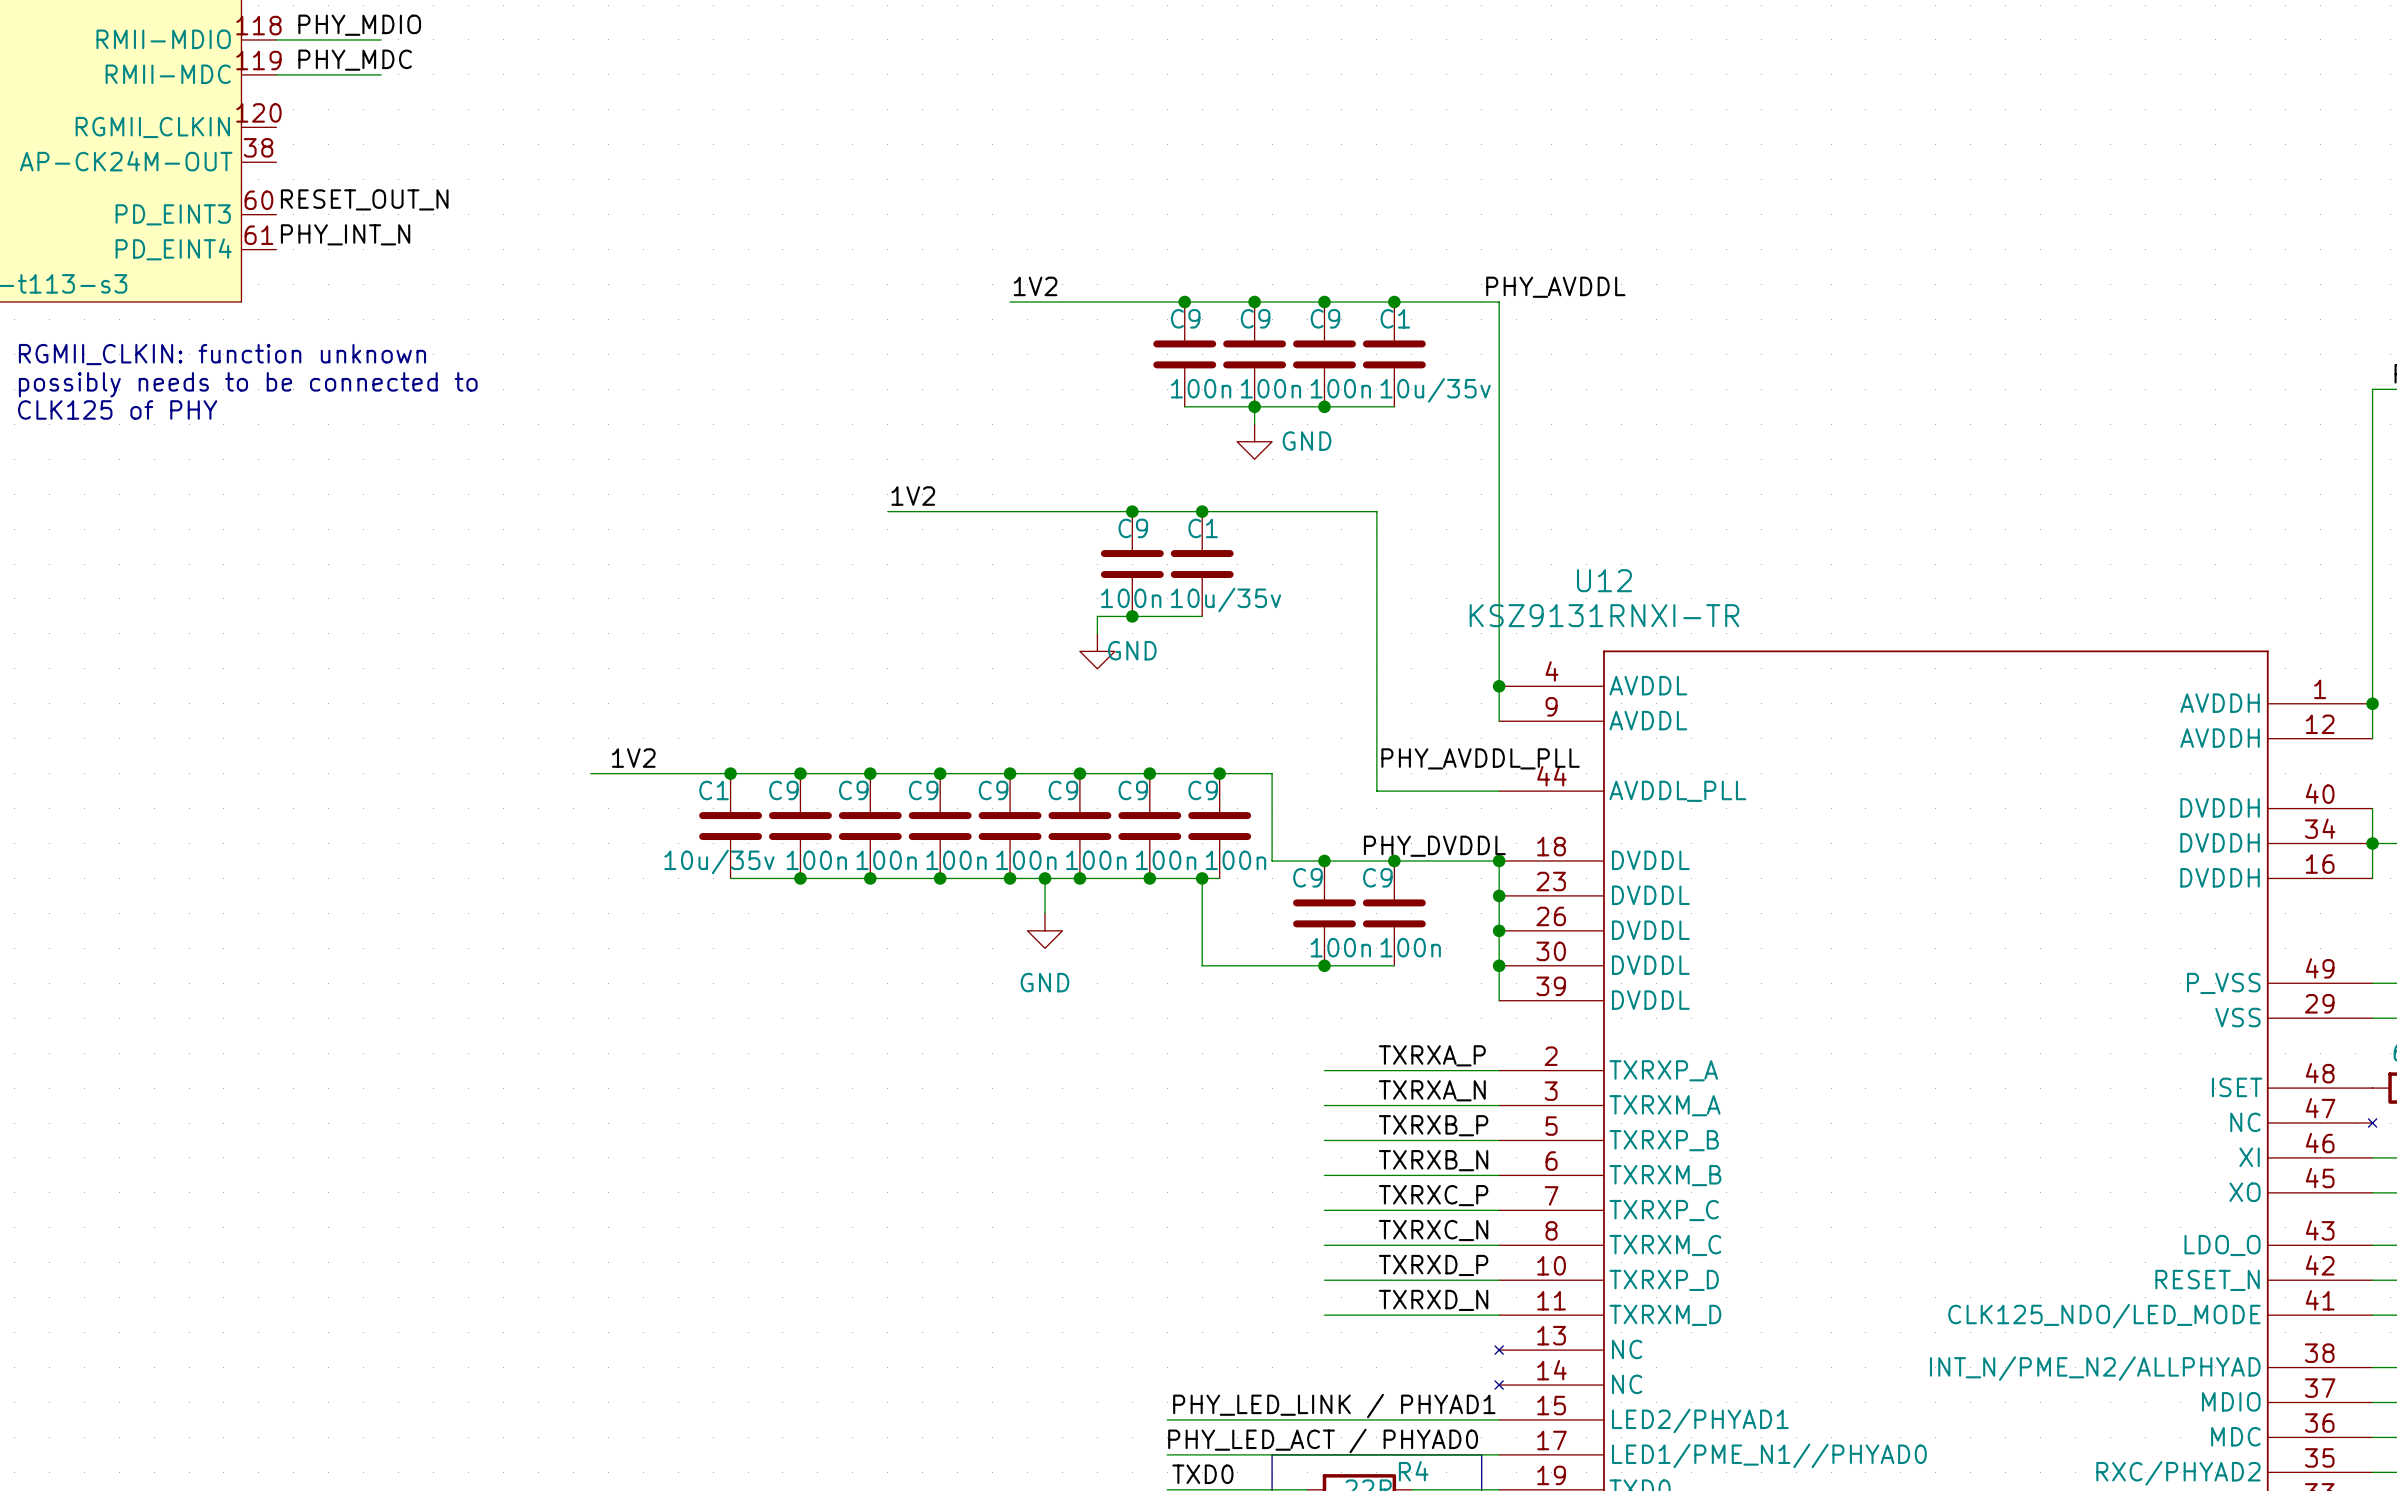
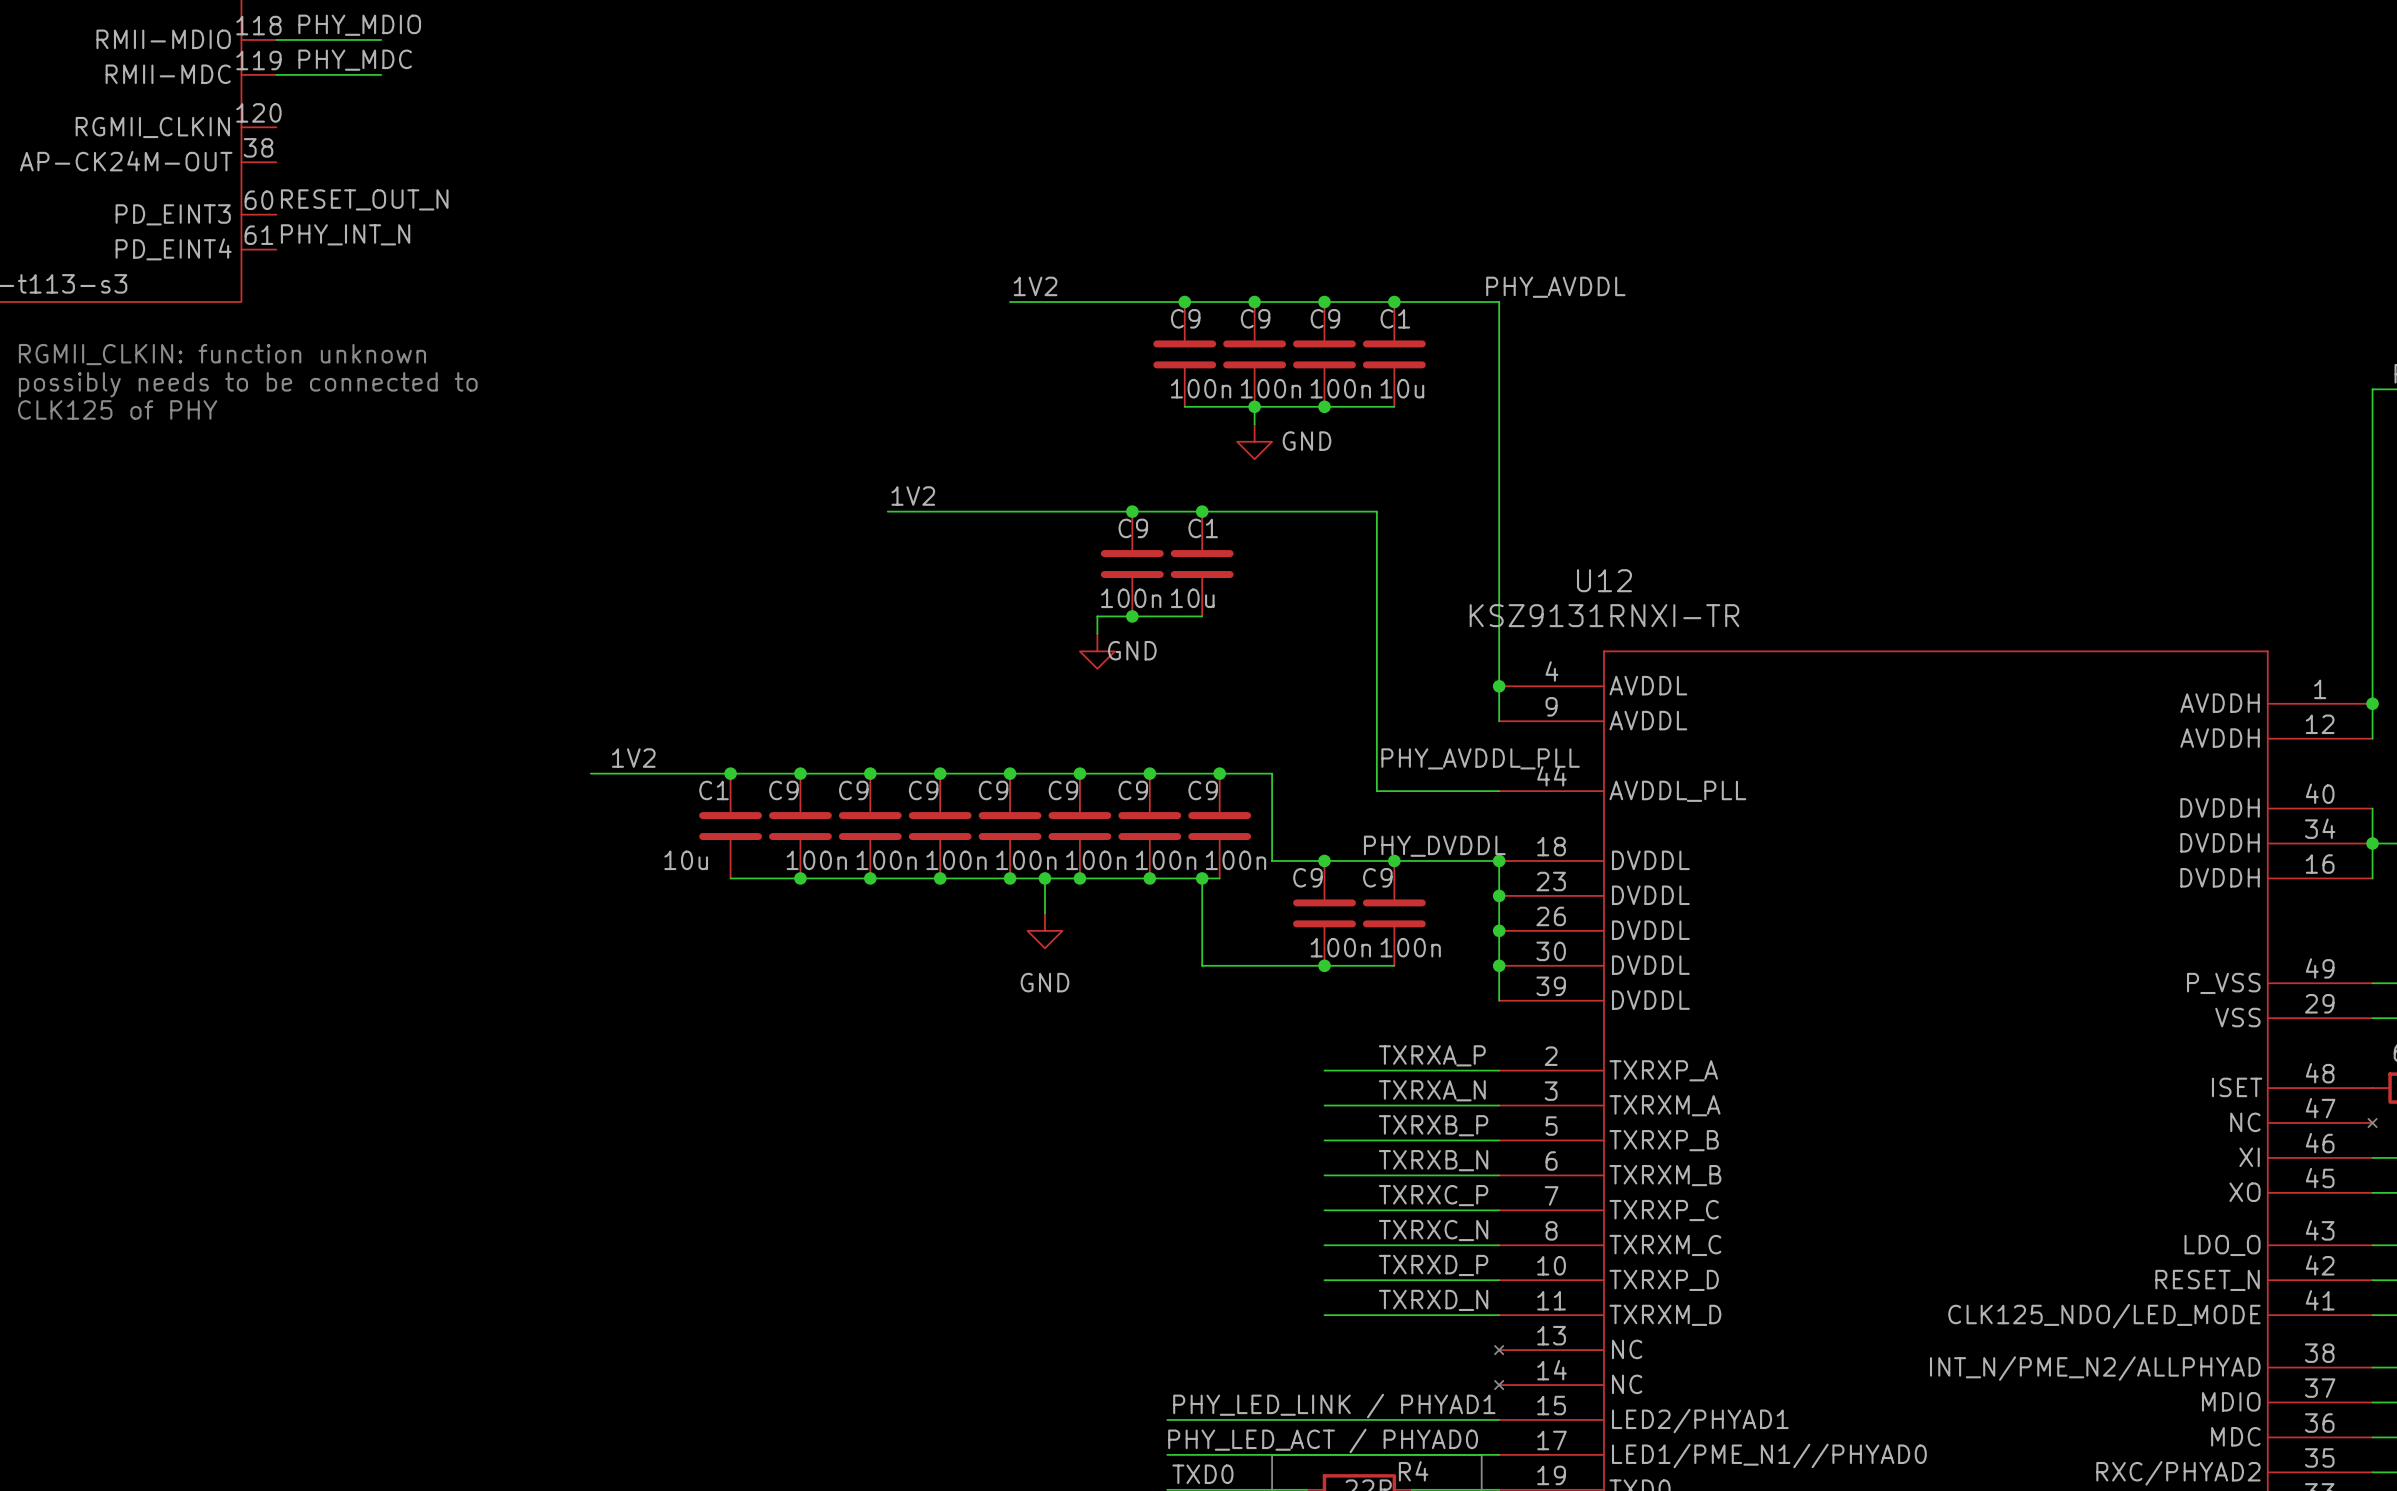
C1 value: 10u/35v (1435, 390) -> 10u (1402, 388)
C1 value: 10u/35v (1226, 599) -> 10u (1192, 598)
C1 value: 10u/35v (719, 861) -> 10u (686, 860)

